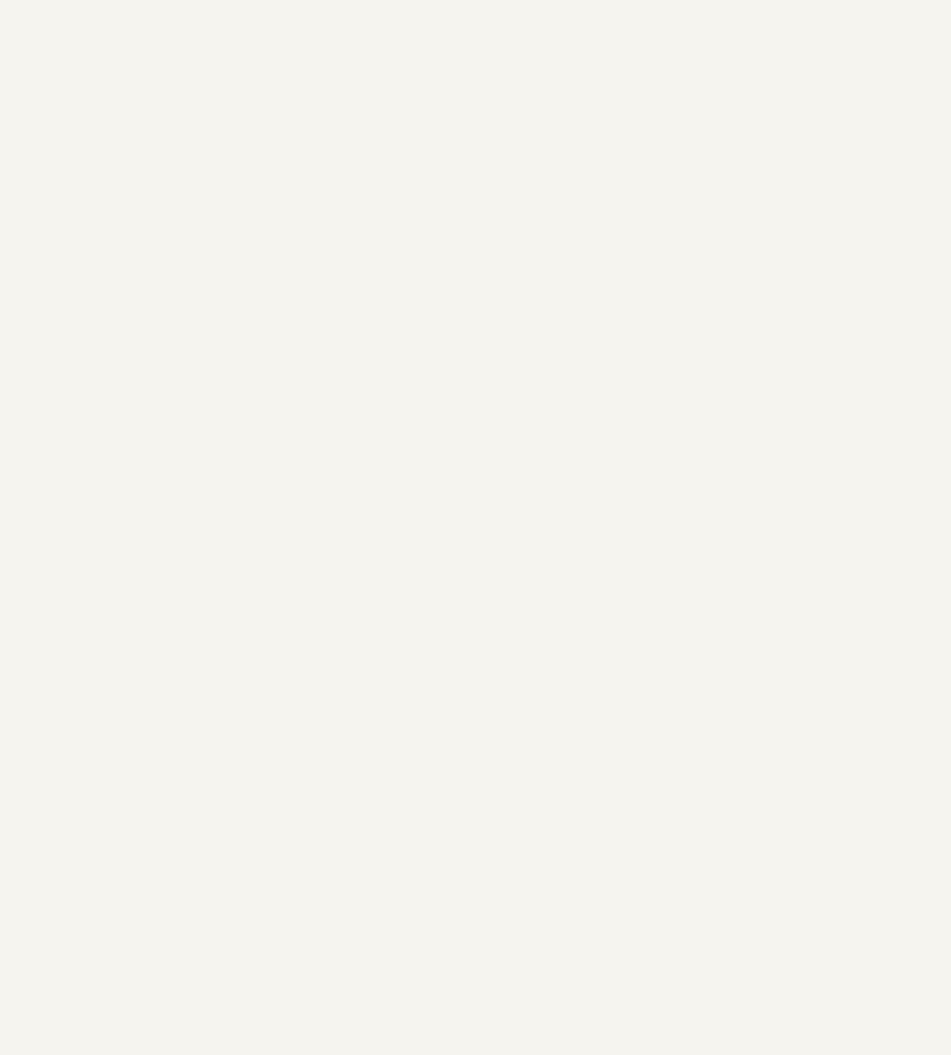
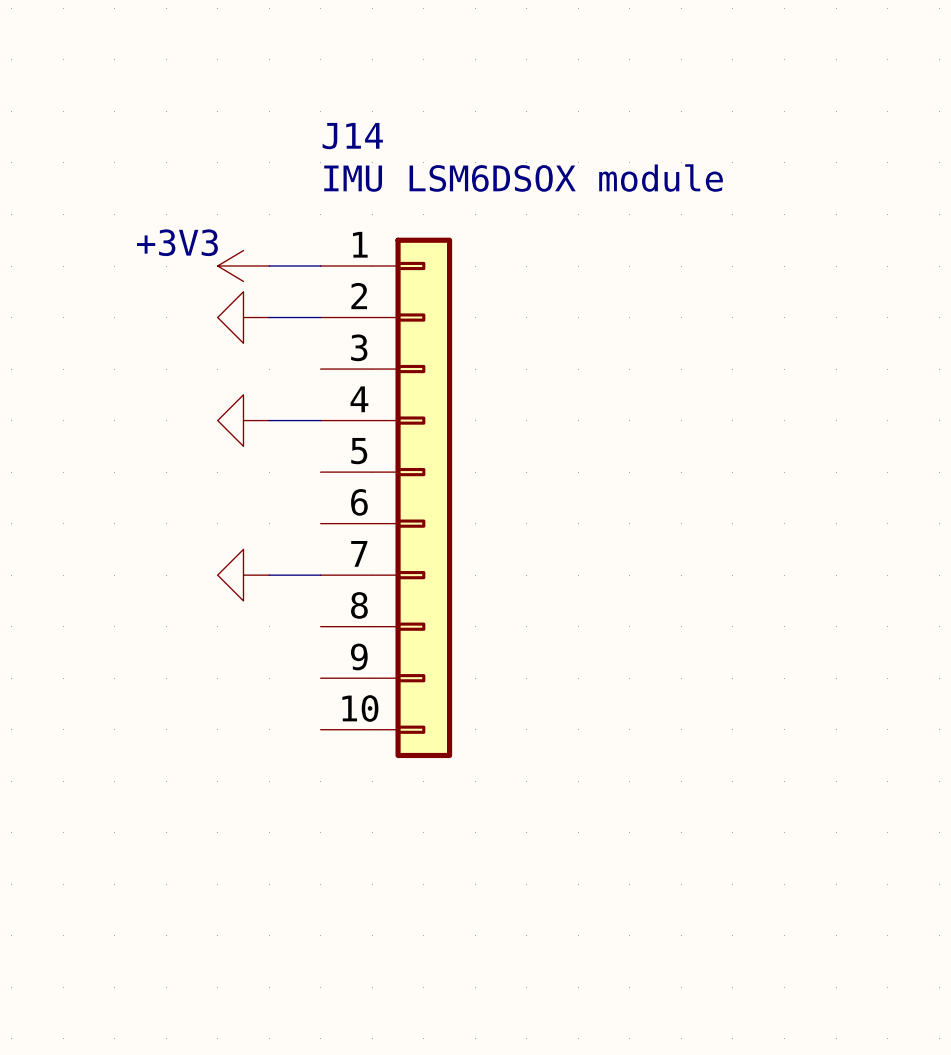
power symbol: none -> +3V3 (243, 266)
wire: none -> (269, 266) (320, 266)
power symbol: none -> (243, 317)
wire: none -> (269, 317) (320, 317)
power symbol: none -> (243, 420)
wire: none -> (269, 420) (320, 420)
J14: none -> IMU LSM6DSOX module (386, 497)
power symbol: none -> (243, 575)
wire: none -> (269, 575) (320, 575)

